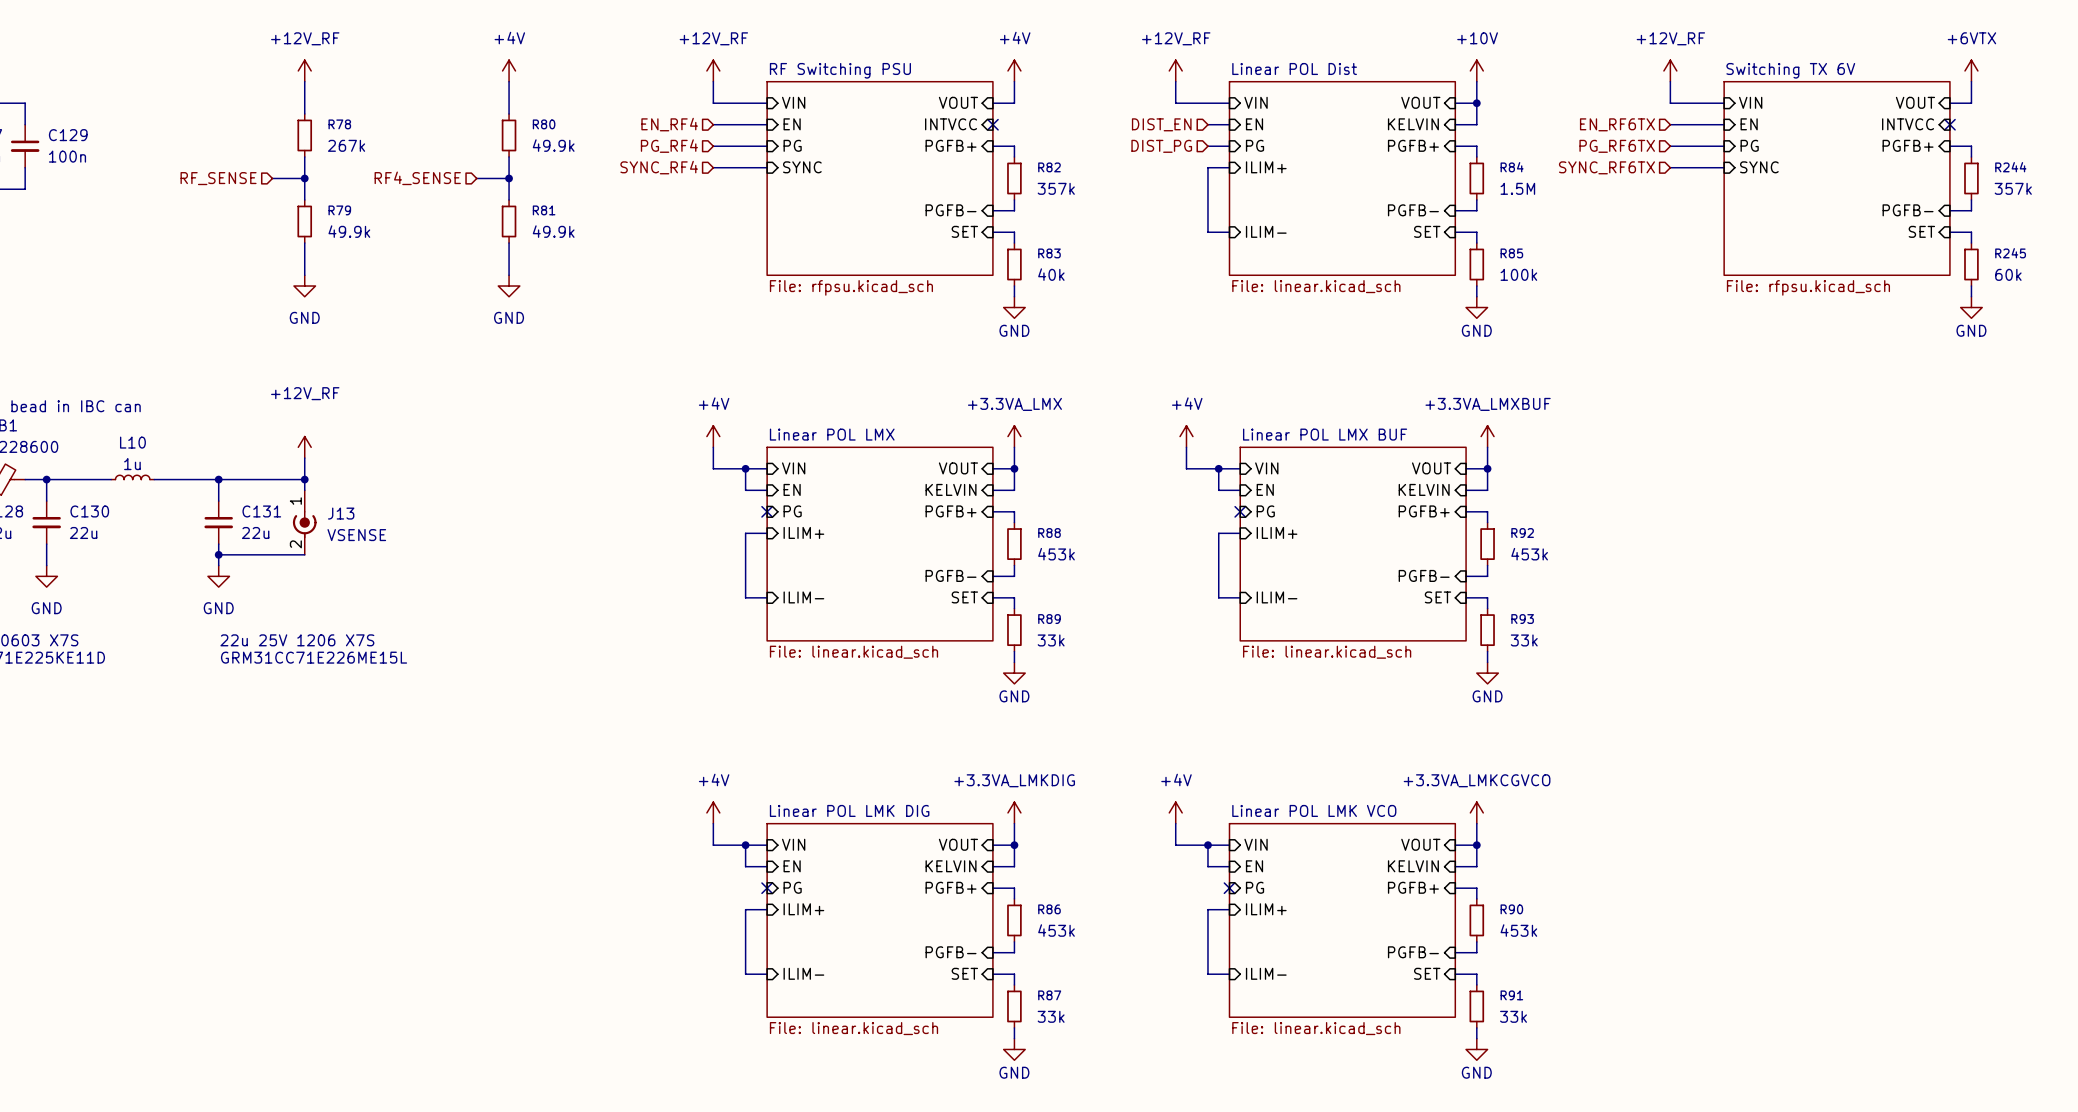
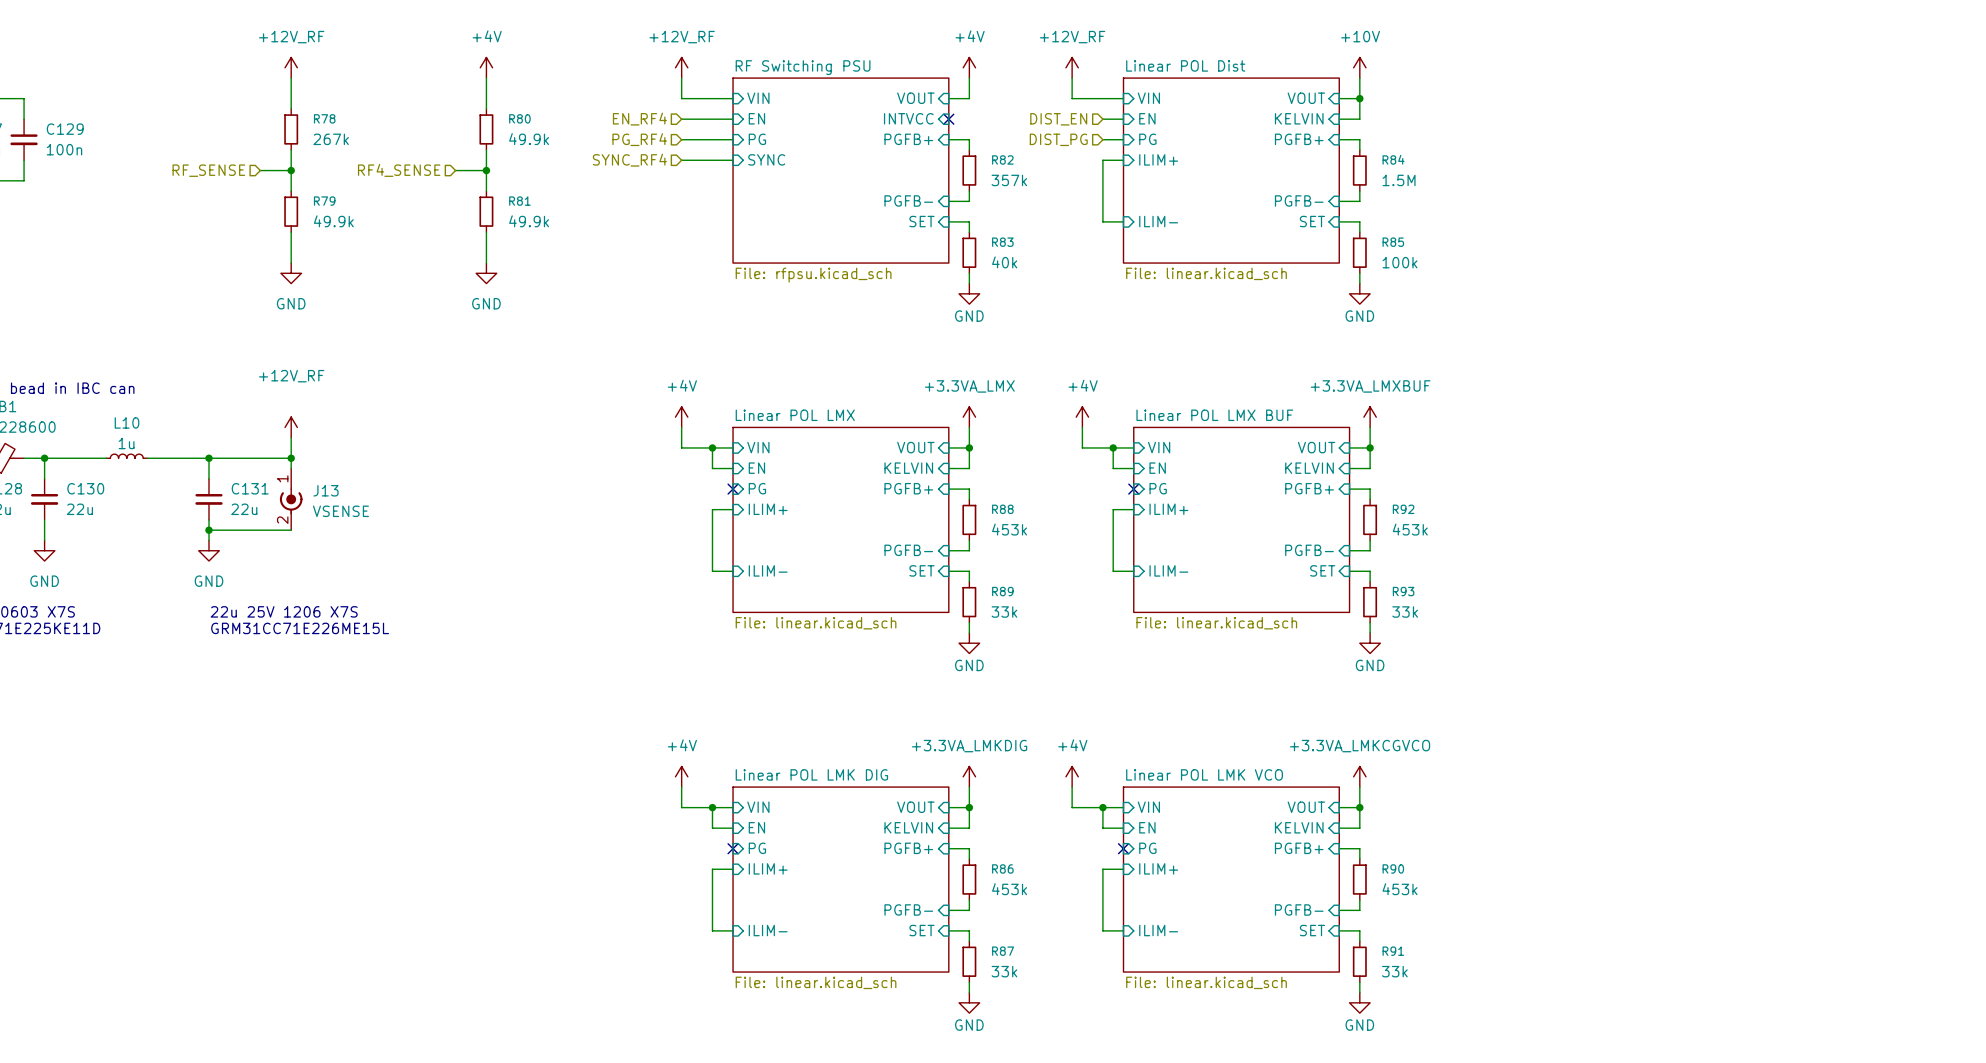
power symbol position: +12V_RF (1175, 70) -> +12V_RF (1072, 67)
power symbol position: +10V (1476, 70) -> +10V (1359, 67)
power symbol: +12V_RF (1670, 70) -> none
power symbol: +6VTX (1971, 70) -> none
wire: (1175, 81) (1175, 103) (1229, 103) -> (1072, 78) (1072, 98) (1123, 98)
wire: (1476, 81) (1476, 124) (1455, 124) -> (1359, 78) (1359, 119) (1339, 119)
wire: (1670, 81) (1670, 103) (1724, 103) -> none
wire: (1971, 81) (1971, 103) (1949, 103) -> none
sheet pin position: VIN (1256, 102) -> VIN (1148, 98)
sheet pin position: VOUT (1420, 102) -> VOUT (1306, 98)
sheet pin: VIN (1750, 102) -> none
sheet pin: VOUT (1915, 102) -> none
junction: none -> (1359, 98)
wire: (1455, 103) (1476, 103) -> (1339, 98) (1359, 98)
junction: (1476, 103) -> none
hierarchical label position: DIST_EN (1161, 124) -> DIST_EN (1058, 119)
wire: (1207, 124) (1229, 124) -> (1102, 119) (1123, 119)
sheet pin position: EN (1254, 124) -> EN (1147, 118)
sheet pin position: KELVIN (1413, 124) -> KELVIN (1299, 118)
hierarchical label: EN_RF6TX (1617, 124) -> none
wire: (1670, 124) (1724, 124) -> none
sheet pin: EN (1749, 124) -> none
sheet pin: INTVCC (1908, 124) -> none
no-connect mark: (1949, 124) -> none
sheet pin position: PG (1255, 145) -> PG (1147, 139)
sheet pin position: PGFB+ (1413, 145) -> PGFB+ (1299, 139)
sheet pin: PG (1749, 145) -> none
sheet pin: PGFB+ (1908, 145) -> none
hierarchical label position: DIST_PG (1161, 146) -> DIST_PG (1058, 139)
wire: (1207, 146) (1229, 146) -> (1102, 139) (1123, 139)
wire: (1455, 146) (1476, 146) (1476, 156) -> (1339, 139) (1359, 139) (1359, 150)
hierarchical label: PG_RF6TX (1617, 146) -> none
wire: (1670, 146) (1724, 146) -> none
wire: (1949, 146) (1971, 146) (1971, 156) -> none
wire: (1229, 167) (1207, 167) (1207, 232) (1229, 232) -> (1123, 160) (1102, 160) (1102, 221) (1123, 221)
sheet pin position: ILIM+ (1266, 167) -> ILIM+ (1158, 159)
hierarchical label: SYNC_RF6TX (1606, 167) -> none
wire: (1670, 167) (1724, 167) -> none
sheet pin: SYNC (1759, 167) -> none
sheet Linear POL Dist position: (1342, 178) -> (1231, 170)
R84 position: (1476, 178) -> (1359, 170)
sheet Switching TX 6V: File: rfpsu.kicad_sch (1837, 178) -> none
R244: 357k (1971, 178) -> none
wire: (1476, 199) (1476, 210) (1455, 210) -> (1359, 191) (1359, 201) (1339, 201)
wire: (1971, 199) (1971, 210) (1949, 210) -> none
sheet pin position: PGFB- (1413, 210) -> PGFB- (1299, 200)
sheet pin: PGFB- (1908, 210) -> none
sheet pin position: ILIM- (1266, 231) -> ILIM- (1158, 221)
sheet pin position: SET (1427, 231) -> SET (1312, 221)
sheet pin: SET (1921, 231) -> none
wire: (1455, 232) (1476, 232) (1476, 243) -> (1339, 221) (1359, 221) (1359, 232)
wire: (1949, 232) (1971, 232) (1971, 243) -> none
R85 position: (1476, 264) -> (1359, 252)
R245: 60k (1971, 264) -> none
wire: (1476, 286) (1476, 296) -> (1359, 273) (1359, 283)
wire: (1971, 286) (1971, 296) -> none
power symbol position: GND (1476, 307) -> GND (1359, 293)
power symbol: GND (1971, 307) -> none
power symbol position: +4V (1186, 436) -> +4V (1082, 417)
power symbol position: +3.3VA_LMXBUF (1487, 436) -> +3.3VA_LMXBUF (1370, 417)
wire: (1186, 447) (1186, 468) (1240, 468) -> (1082, 427) (1082, 447) (1133, 447)
wire: (1487, 447) (1487, 490) (1466, 490) -> (1370, 427) (1370, 468) (1349, 468)
junction: none -> (1113, 447)
wire: (1218, 468) (1218, 490) (1240, 490) -> (1113, 447) (1113, 468) (1133, 468)
junction: (1218, 468) -> none
sheet pin position: VIN (1266, 468) -> VIN (1159, 447)
sheet pin position: VOUT (1431, 468) -> VOUT (1316, 447)
junction: none -> (1370, 447)
wire: (1466, 468) (1487, 468) -> (1349, 447) (1370, 447)
junction: (1487, 468) -> none
sheet pin position: EN (1265, 489) -> EN (1157, 468)
sheet pin position: KELVIN (1424, 489) -> KELVIN (1309, 468)
no-connect mark: none -> (1133, 489)
no-connect mark: (1240, 511) -> none
sheet pin position: PG (1265, 511) -> PG (1158, 488)
sheet pin position: PGFB+ (1424, 511) -> PGFB+ (1309, 488)
wire: (1466, 511) (1487, 511) (1487, 522) -> (1349, 489) (1370, 489) (1370, 499)
sheet pin position: ILIM+ (1277, 532) -> ILIM+ (1168, 509)
wire: (1240, 533) (1218, 533) (1218, 597) (1240, 597) -> (1133, 509) (1113, 509) (1113, 571) (1133, 571)
sheet Linear POL LMX BUF position: (1353, 544) -> (1241, 519)
R92 position: (1487, 544) -> (1370, 519)
wire: (1487, 565) (1487, 576) (1466, 576) -> (1370, 540) (1370, 550) (1349, 550)
sheet pin position: PGFB- (1424, 575) -> PGFB- (1309, 550)
sheet pin position: ILIM- (1277, 597) -> ILIM- (1168, 570)
sheet pin position: SET (1437, 597) -> SET (1322, 570)
wire: (1466, 597) (1487, 597) (1487, 608) -> (1349, 571) (1370, 571) (1370, 581)
R93 position: (1487, 630) -> (1370, 602)
wire: (1487, 651) (1487, 662) -> (1370, 622) (1370, 632)
power symbol position: GND (1487, 673) -> GND (1370, 643)
power symbol position: +4V (1175, 812) -> +4V (1072, 776)
power symbol position: +3.3VA_LMKCGVCO (1476, 812) -> +3.3VA_LMKCGVCO (1359, 776)
wire: (1175, 823) (1175, 845) (1229, 845) -> (1072, 787) (1072, 807) (1123, 807)
wire: (1476, 823) (1476, 866) (1455, 866) -> (1359, 787) (1359, 828) (1339, 828)
sheet pin position: VIN (1256, 844) -> VIN (1148, 807)
sheet pin position: VOUT (1420, 844) -> VOUT (1306, 807)
junction: none -> (1102, 807)
wire: (1207, 845) (1207, 866) (1229, 866) -> (1102, 807) (1102, 828) (1123, 828)
junction: (1207, 845) -> none
junction: none -> (1359, 807)
wire: (1455, 845) (1476, 845) -> (1339, 807) (1359, 807)
junction: (1476, 845) -> none
sheet pin position: EN (1254, 866) -> EN (1147, 827)
sheet pin position: KELVIN (1413, 866) -> KELVIN (1299, 827)
sheet pin position: PG (1255, 887) -> PG (1147, 848)
sheet pin position: PGFB+ (1413, 887) -> PGFB+ (1299, 848)
no-connect mark: none -> (1123, 848)
no-connect mark: (1229, 888) -> none
wire: (1455, 888) (1476, 888) (1476, 898) -> (1339, 848) (1359, 848) (1359, 858)
wire: (1229, 909) (1207, 909) (1207, 974) (1229, 974) -> (1123, 869) (1102, 869) (1102, 930) (1123, 930)
sheet pin position: ILIM+ (1266, 909) -> ILIM+ (1158, 868)
sheet Linear POL LMK VCO position: (1342, 920) -> (1231, 879)
R90 position: (1476, 920) -> (1359, 879)
wire: (1476, 941) (1476, 952) (1455, 952) -> (1359, 900) (1359, 910) (1339, 910)
sheet pin position: PGFB- (1413, 952) -> PGFB- (1299, 909)
sheet pin position: ILIM- (1266, 973) -> ILIM- (1158, 930)
sheet pin position: SET (1427, 973) -> SET (1312, 930)
wire: (1455, 974) (1476, 974) (1476, 984) -> (1339, 930) (1359, 930) (1359, 941)
R91 position: (1476, 1006) -> (1359, 961)
wire: (1476, 1027) (1476, 1038) -> (1359, 982) (1359, 992)
power symbol position: GND (1476, 1049) -> GND (1359, 1002)

